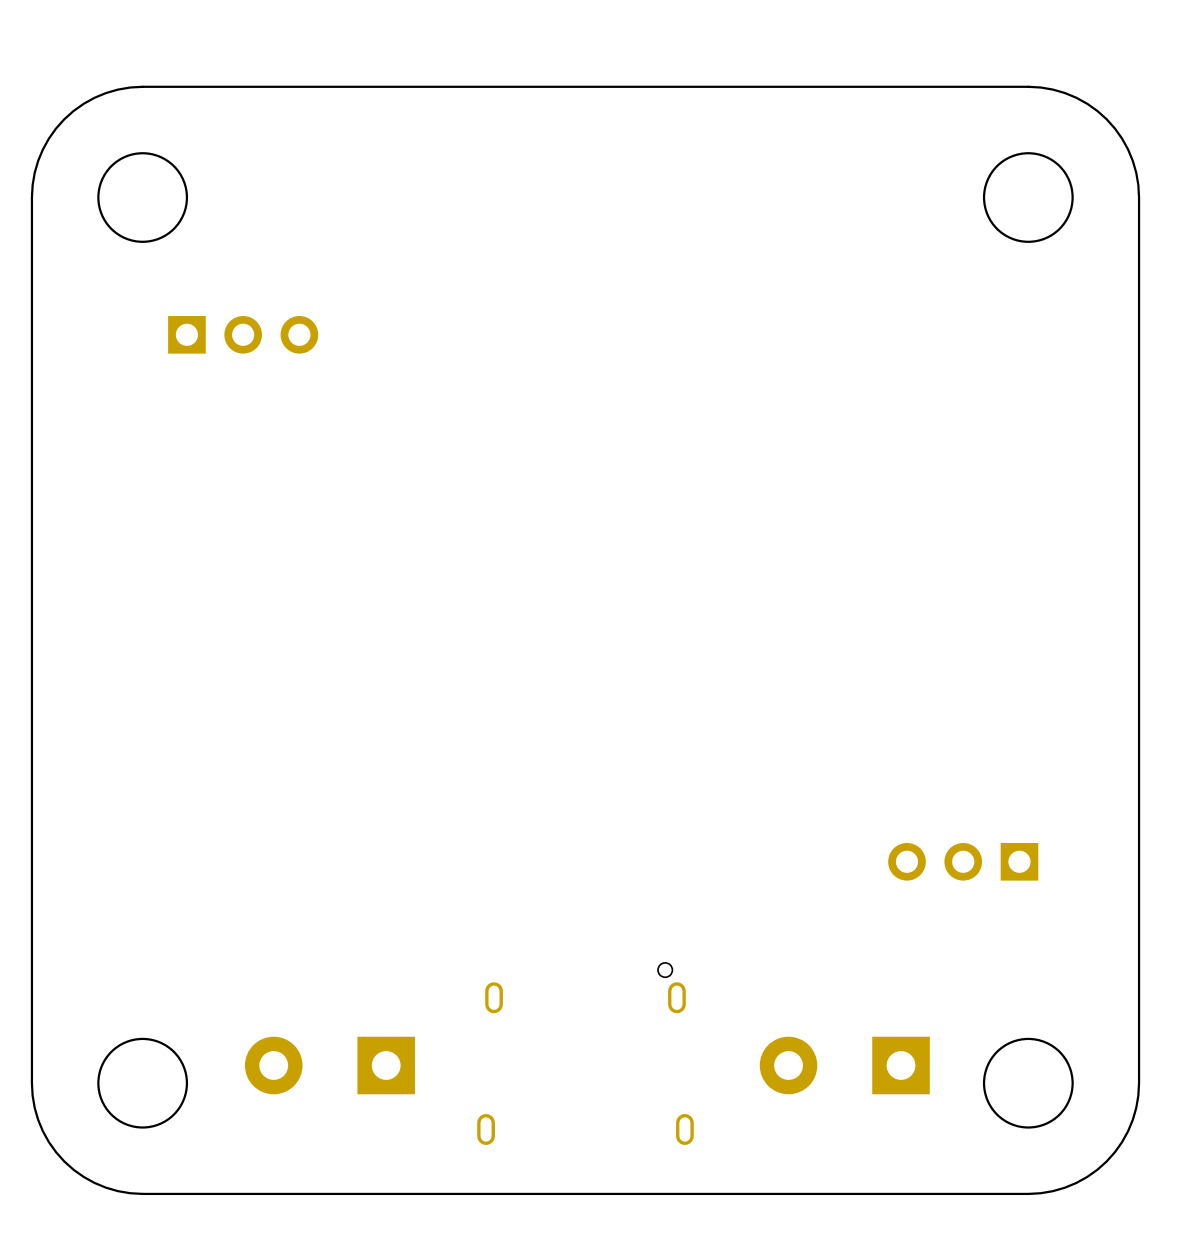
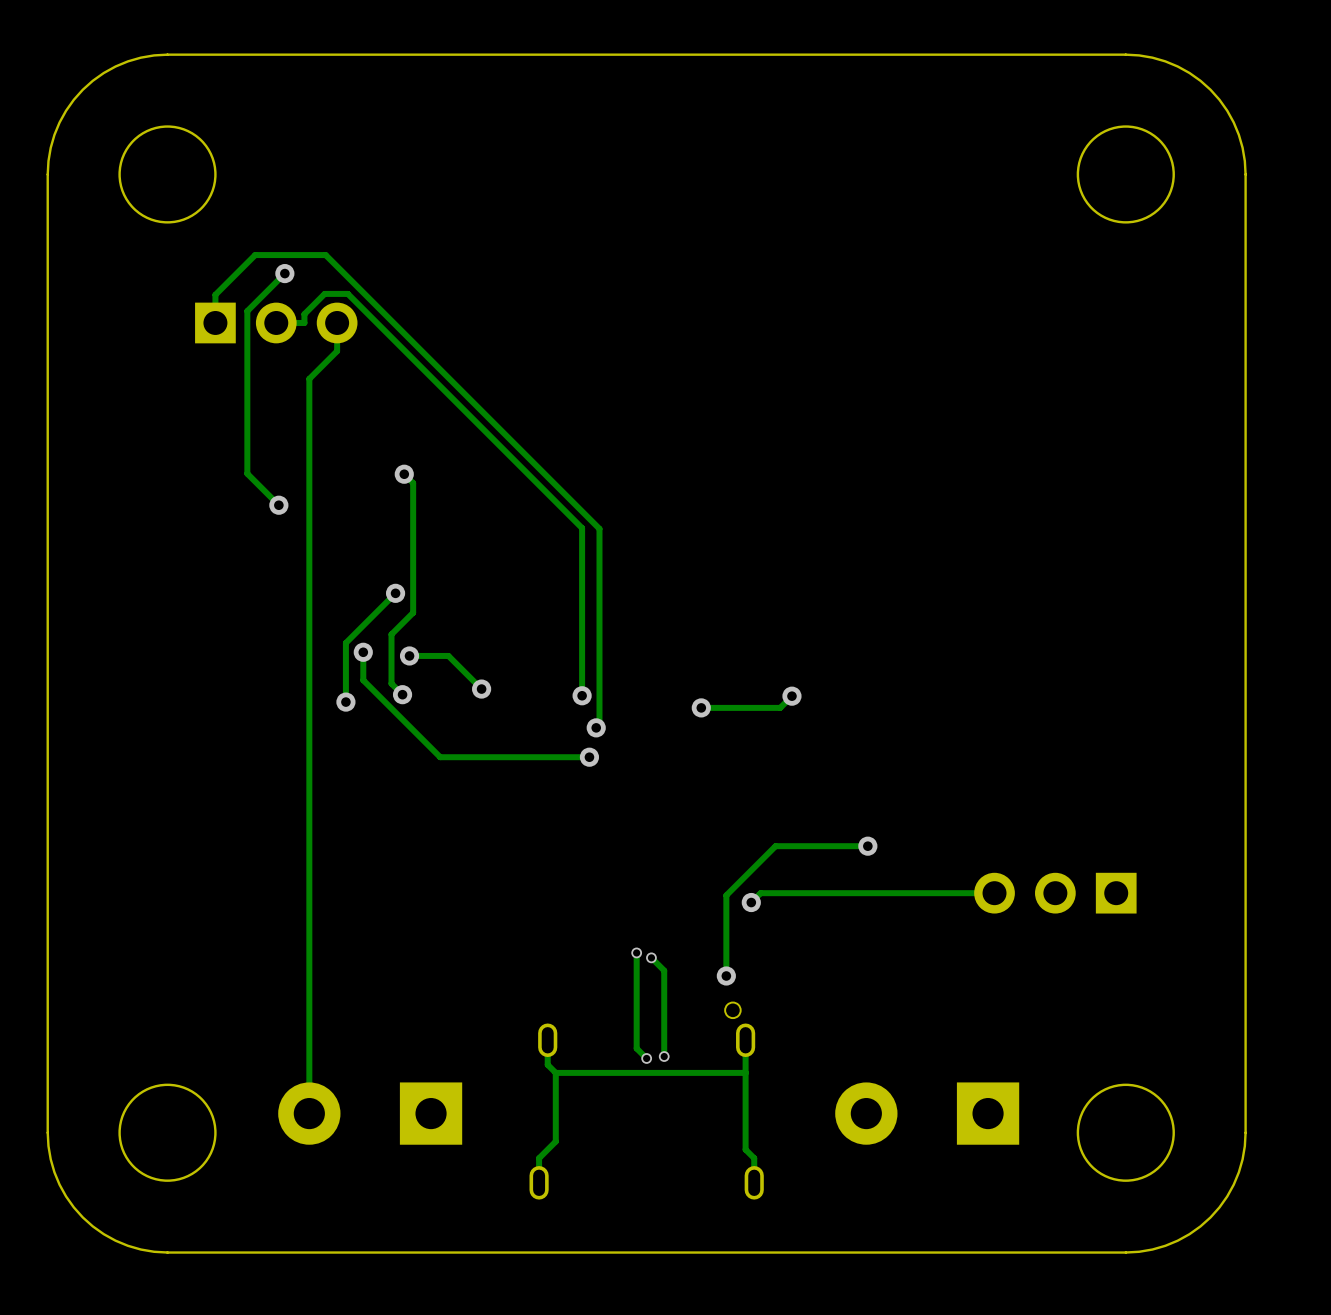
track: none -> (284, 273) (247, 311) (247, 473) (278, 505)
via: none -> (284, 273)
track: none -> (215, 322) (215, 294) (255, 255) (325, 255) (599, 528) (599, 724) (596, 727)
track: none -> (276, 322) (304, 322) (304, 314) (324, 293) (347, 293) (582, 528) (582, 695)
track: none -> (337, 322) (337, 351) (309, 378) (309, 1113)
track: none -> (404, 474) (413, 483) (413, 612) (391, 634) (391, 683) (402, 694)
via: none -> (404, 474)
via: none -> (278, 505)
track: none -> (395, 593) (345, 642) (345, 702)
via: none -> (395, 593)
track: none -> (363, 652) (363, 680) (440, 757) (589, 757)
via: none -> (363, 652)
track: none -> (409, 655) (448, 655) (481, 689)
via: none -> (409, 655)
via: none -> (481, 689)
via: none -> (402, 694)
via: none -> (582, 695)
track: none -> (791, 696) (780, 707) (701, 707)
via: none -> (791, 696)
via: none -> (345, 702)
via: none -> (701, 707)
via: none -> (596, 727)
via: none -> (589, 757)
track: none -> (867, 846) (775, 846) (726, 895) (726, 975)
via: none -> (867, 846)
track: none -> (994, 893) (760, 893) (751, 902)
via: none -> (751, 902)
track: none -> (636, 952) (636, 1048) (646, 1058)
via: none -> (636, 952)
track: none -> (651, 957) (664, 970) (664, 1056)
via: none -> (651, 957)
via: none -> (726, 975)
track: none -> (547, 1040) (547, 1064) (555, 1072)
track: none -> (745, 1040) (745, 1149) (754, 1158) (754, 1182)
via: none -> (664, 1056)
via: none -> (646, 1058)
track: none -> (555, 1072) (555, 1141) (539, 1158) (539, 1182)
track: none -> (745, 1072) (555, 1072)

